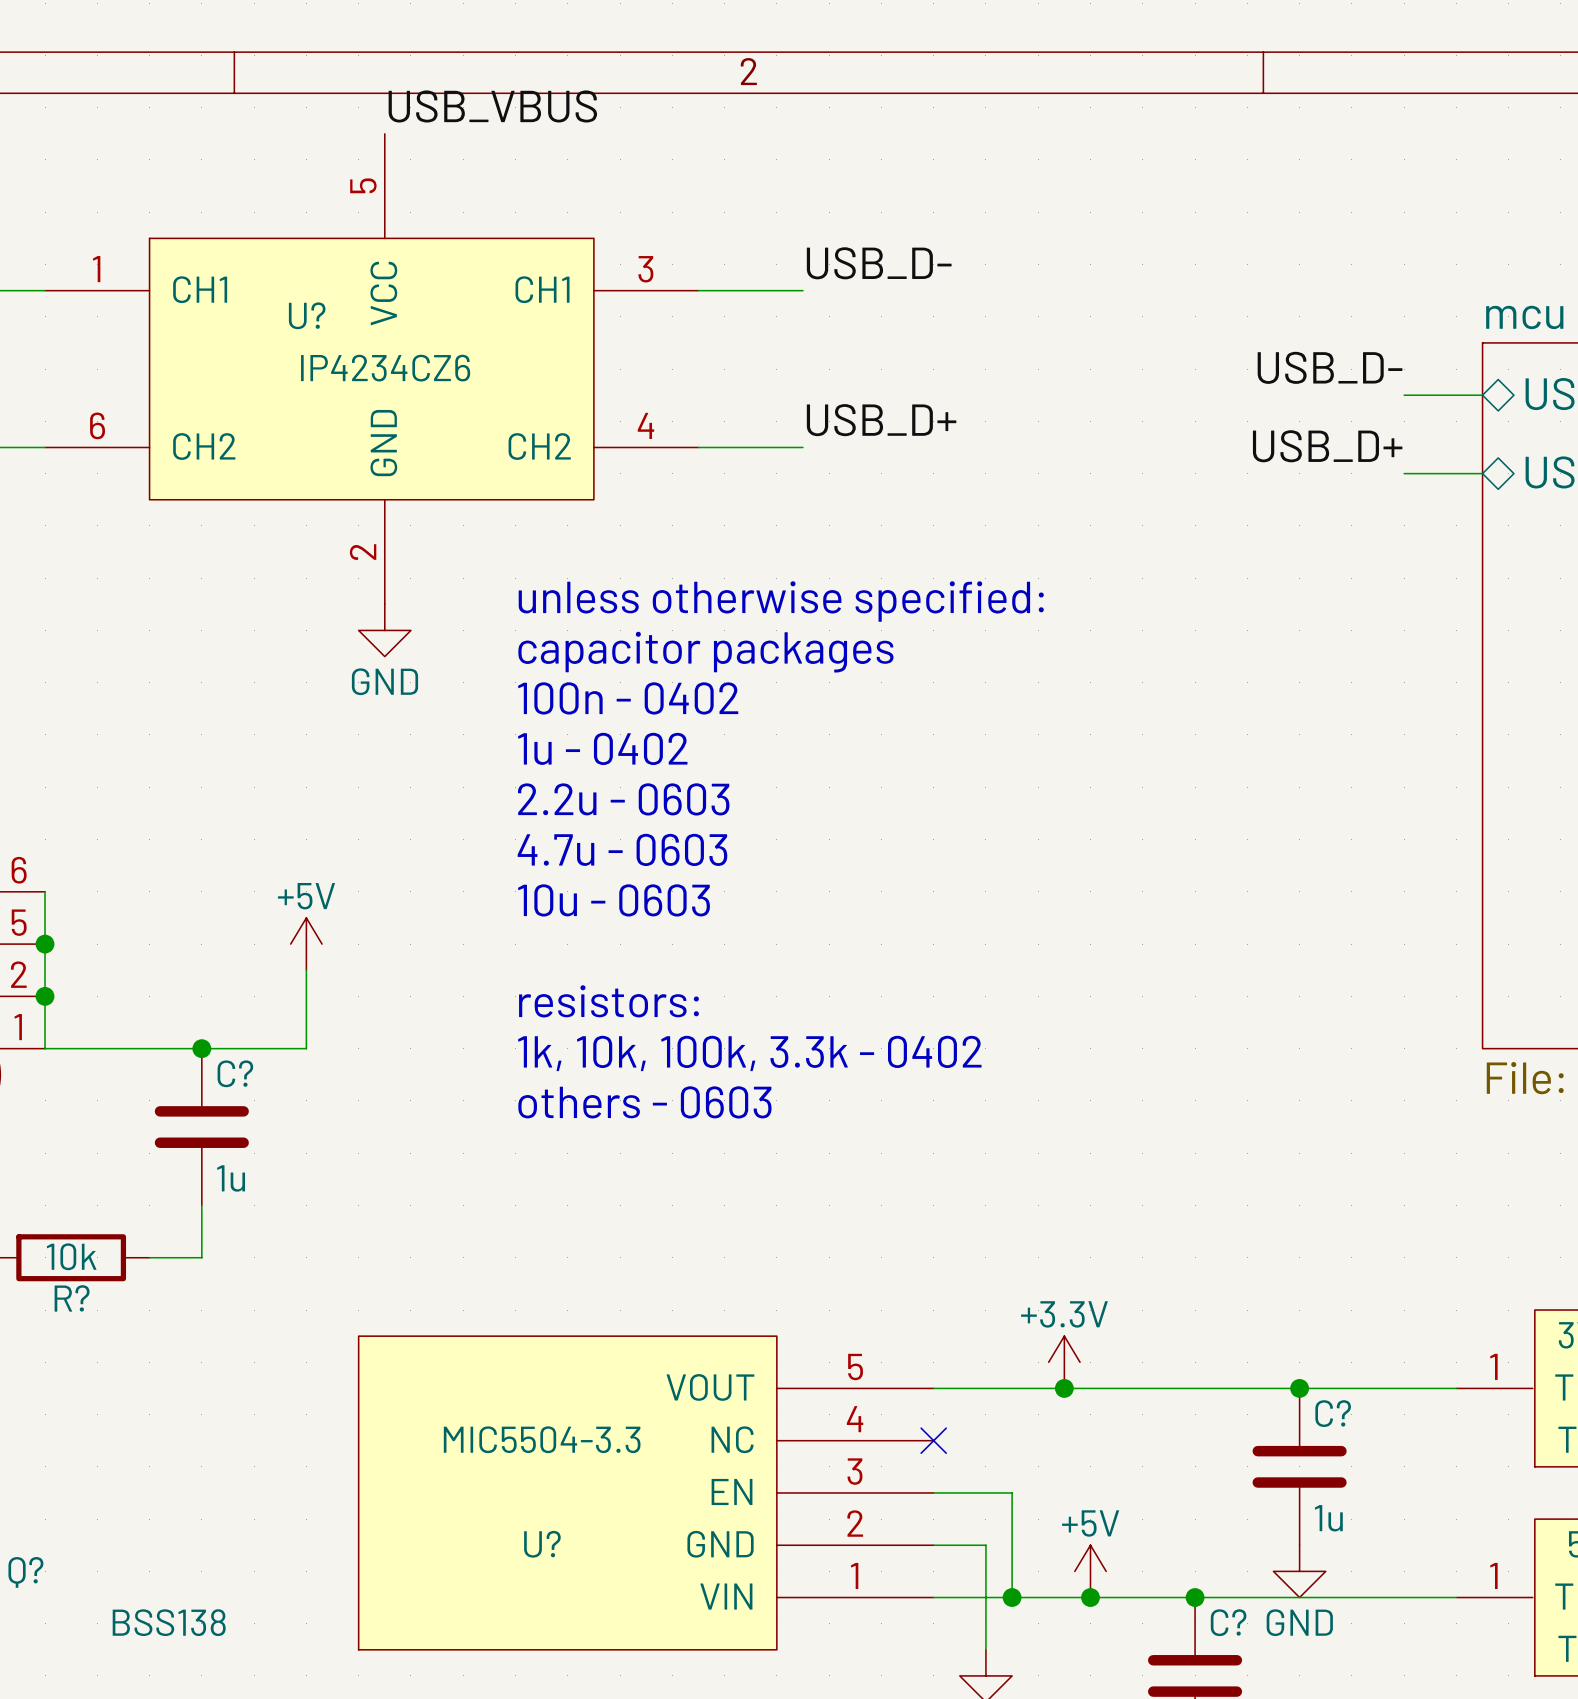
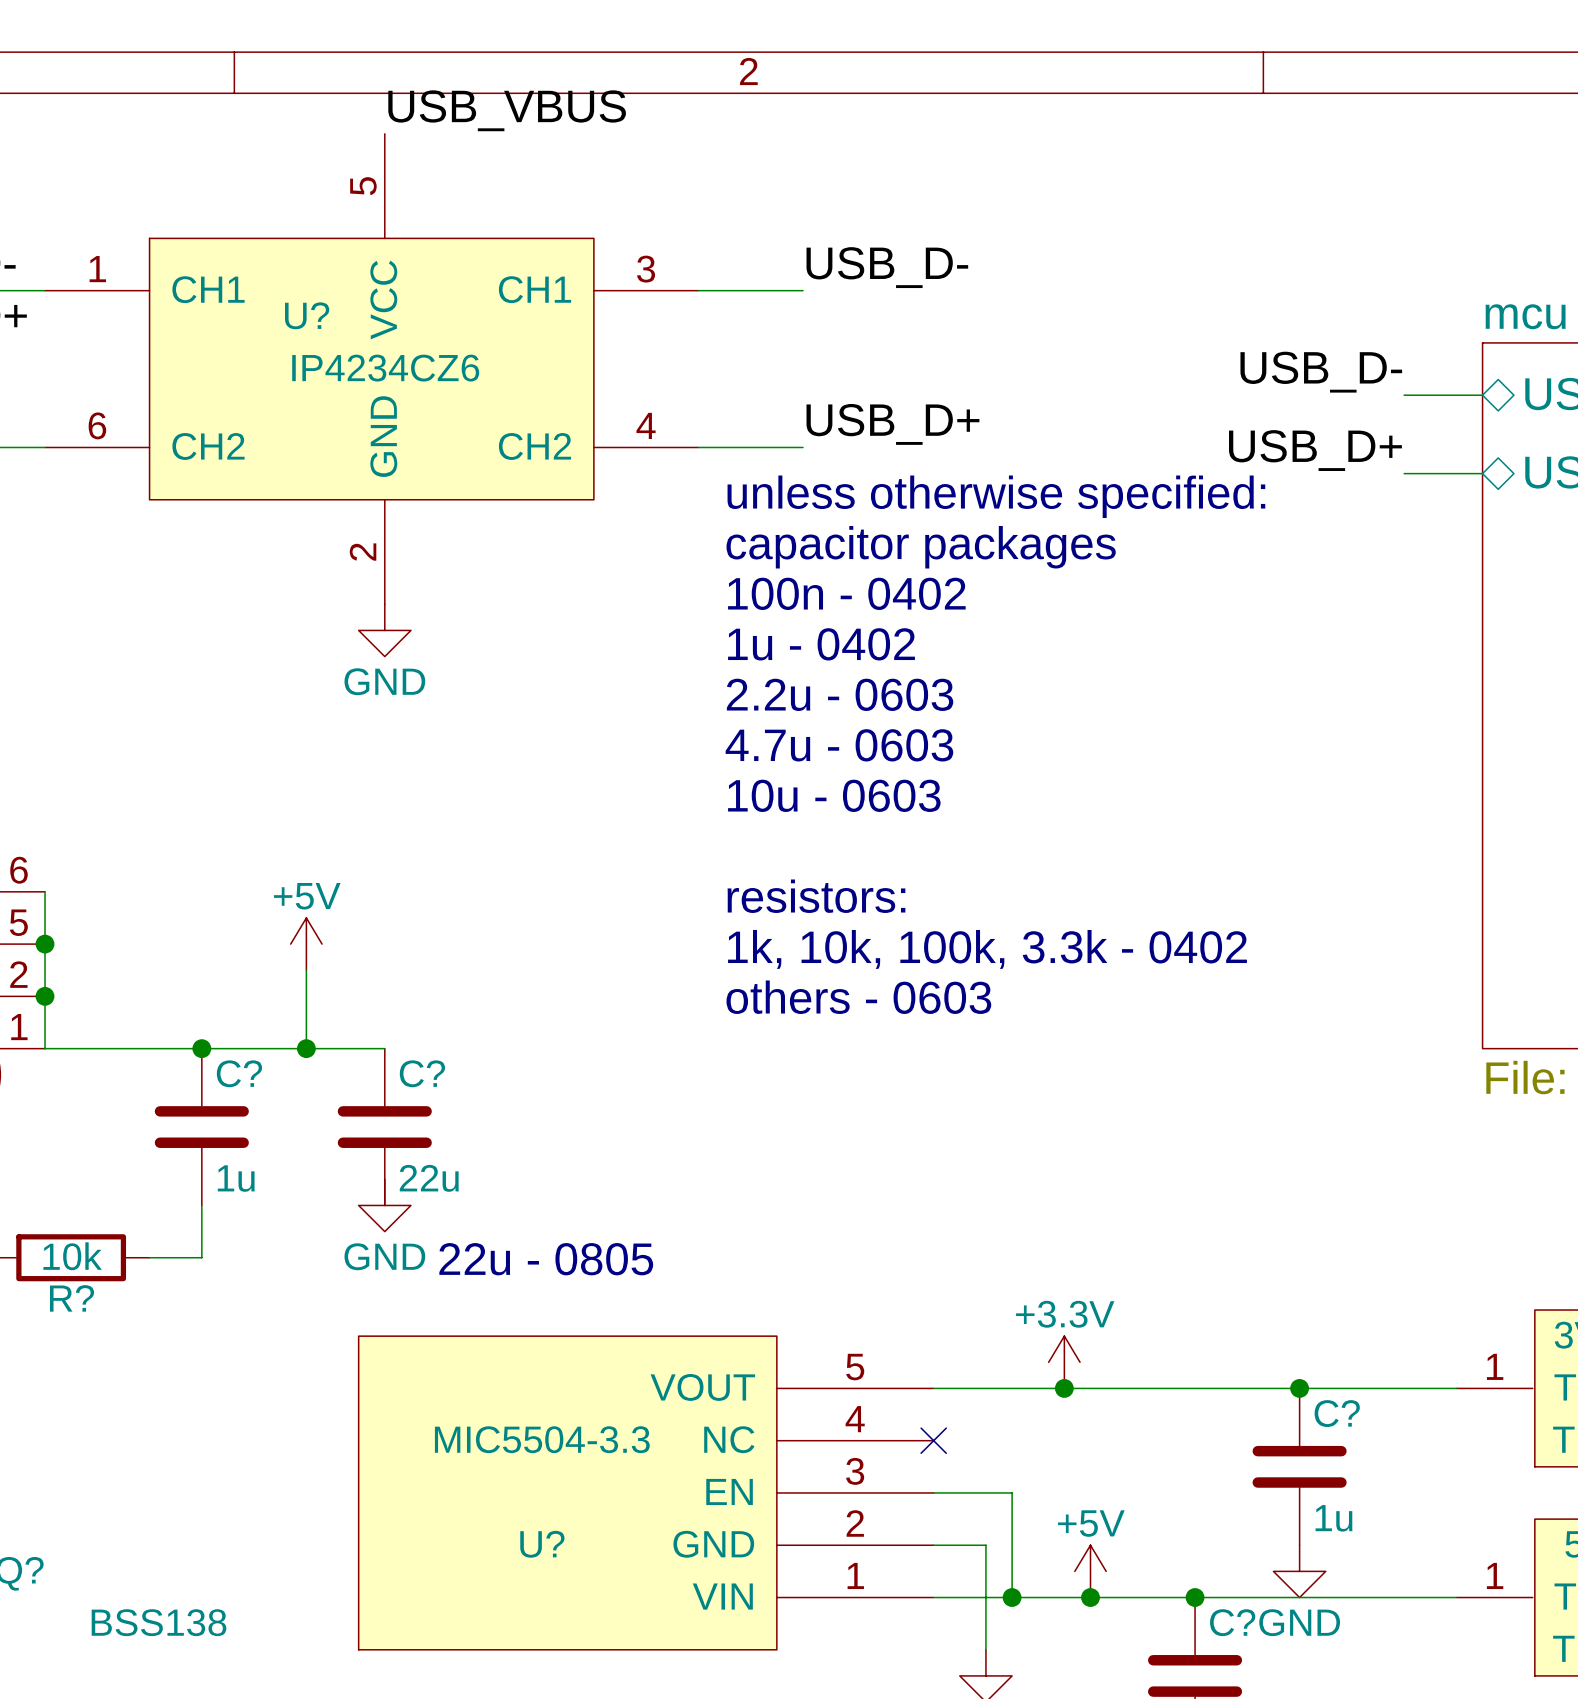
text position: unless otherwise specified: (781, 601) -> unless otherwise specified: (996, 496)
text position: capacitor packages (705, 652) -> capacitor packages (921, 547)
text position: 100n - 0402 (628, 698) -> 100n - 0402 (846, 593)
text position: 1u - 0402 (602, 748) -> 1u - 0402 (821, 644)
text position: 2.2u - 0603 (623, 799) -> 2.2u - 0603 (840, 694)
text position: 4.7u - 0603 (622, 849) -> 4.7u - 0603 (839, 745)
text position: 10u - 0603 (614, 900) -> 10u - 0603 (834, 795)
text position: resistors: (608, 1001) -> resistors: (816, 896)
wire: none -> (306, 1048) (384, 1048)
junction: none -> (306, 1048)
text position: 1k, 10k, 100k, 3.3k - 0402 (749, 1053) -> 1k, 10k, 100k, 3.3k - 0402 (987, 949)
text position: others - 0603 (644, 1102) -> others - 0603 (858, 997)
C?: none -> 22u (384, 1127)
power symbol: none -> GND (384, 1205)
text: none -> 22u - 0805 (546, 1259)

